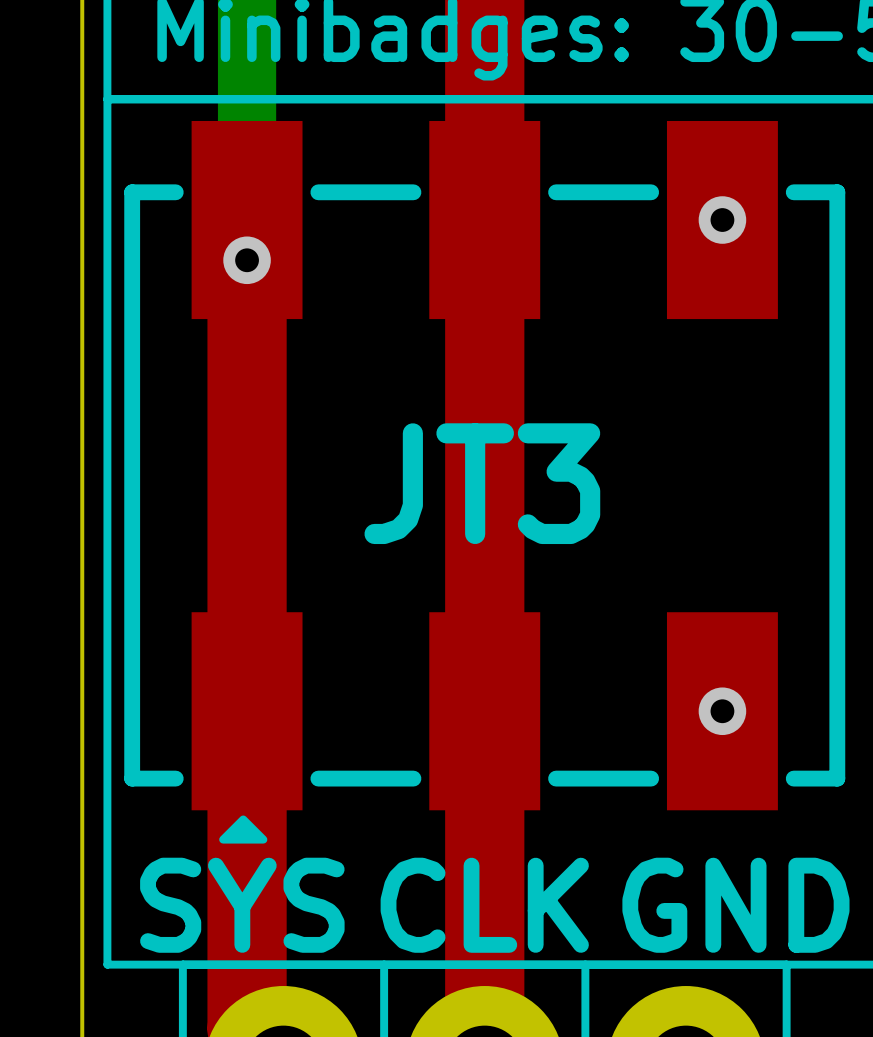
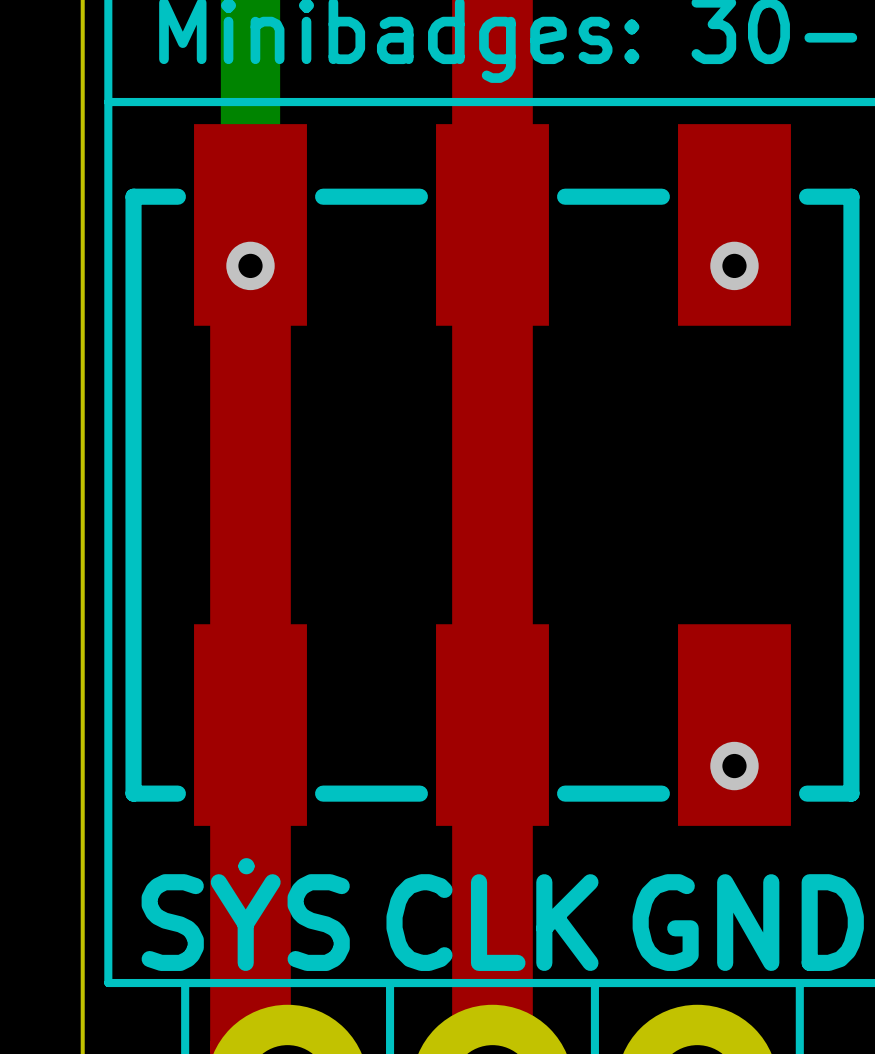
via position: (722, 220) -> (734, 265)
JT3: (484, 482) -> none
part: none -> (492, 499)
via position: (722, 711) -> (734, 766)

